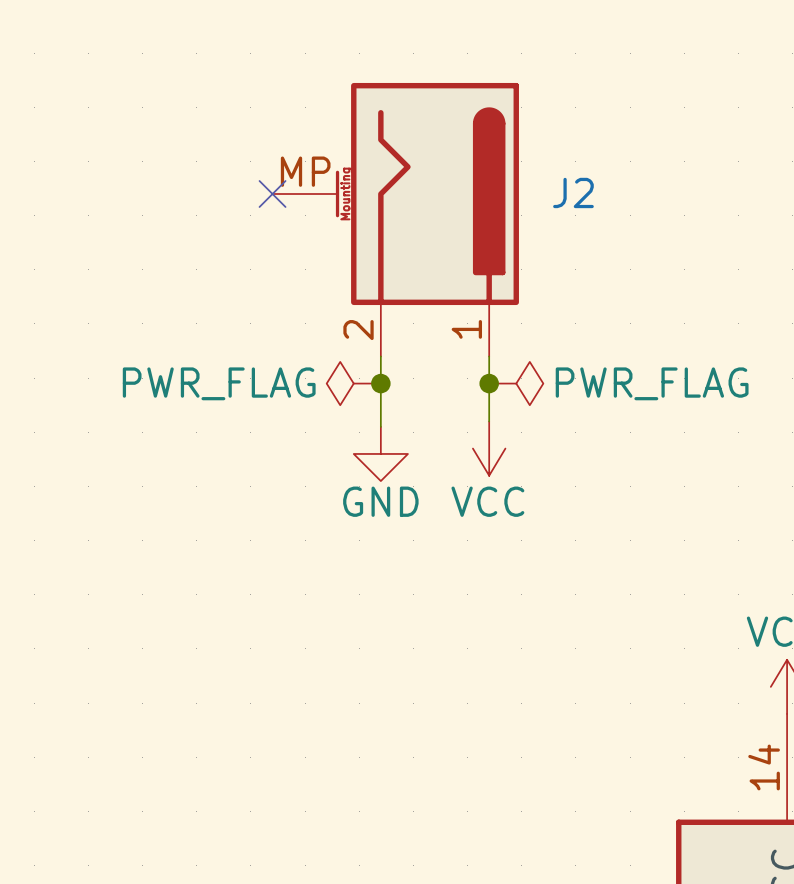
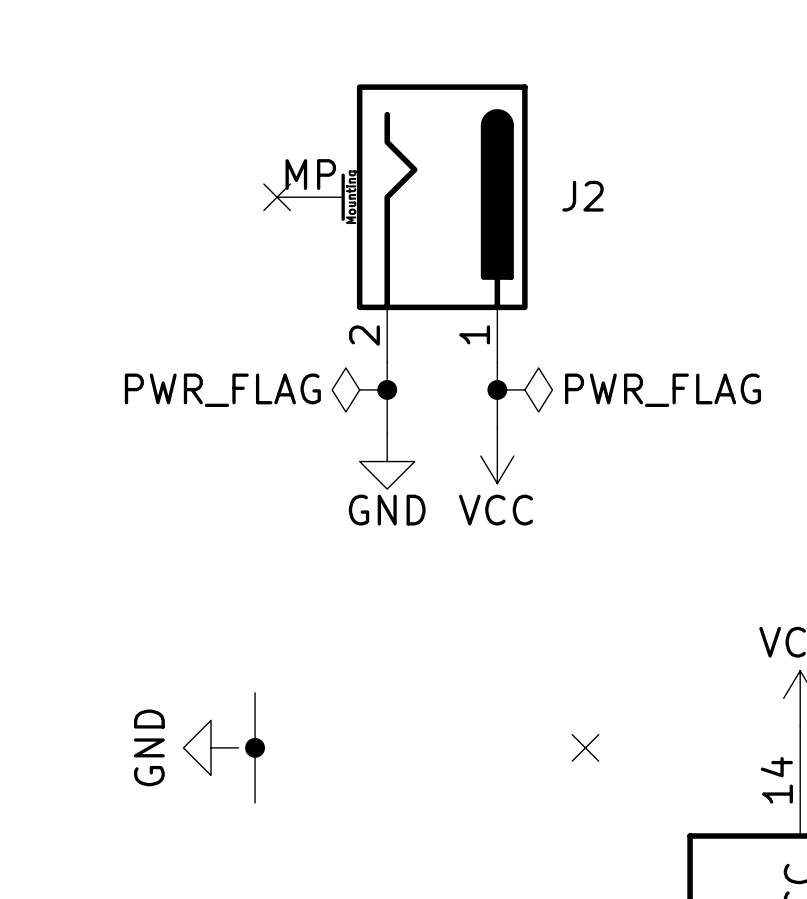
wire: none -> (255, 692) (255, 802)
power symbol: none -> GND (211, 747)
junction: none -> (255, 747)
no-connect mark: none -> (585, 747)

